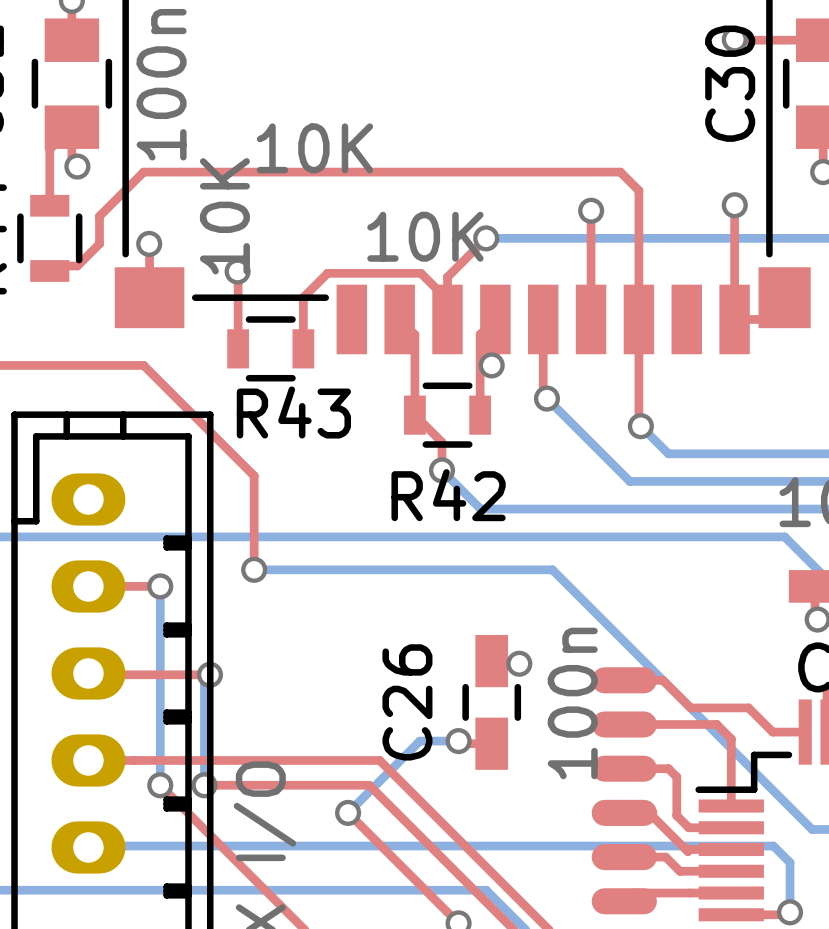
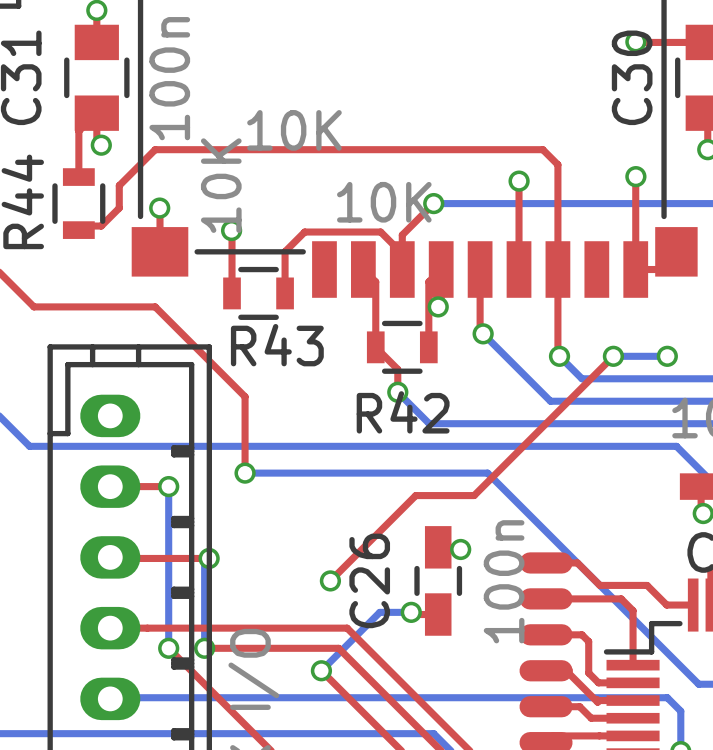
top track: none -> (613, 356) (474, 495) (415, 495) (330, 580)
bottom track: none -> (613, 356) (667, 356)
via: none -> (613, 356)
via: none -> (667, 356)
via: none -> (330, 580)

